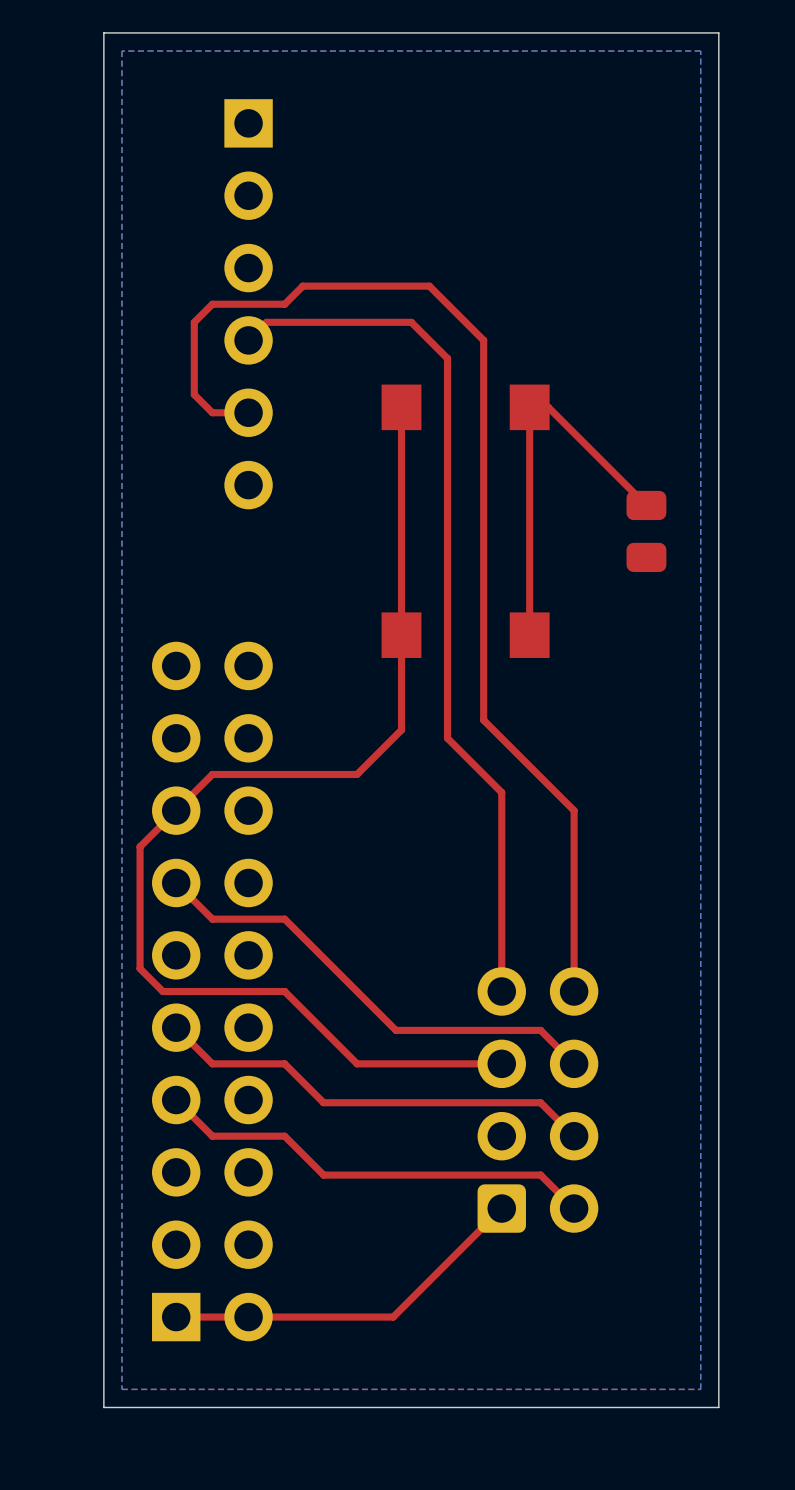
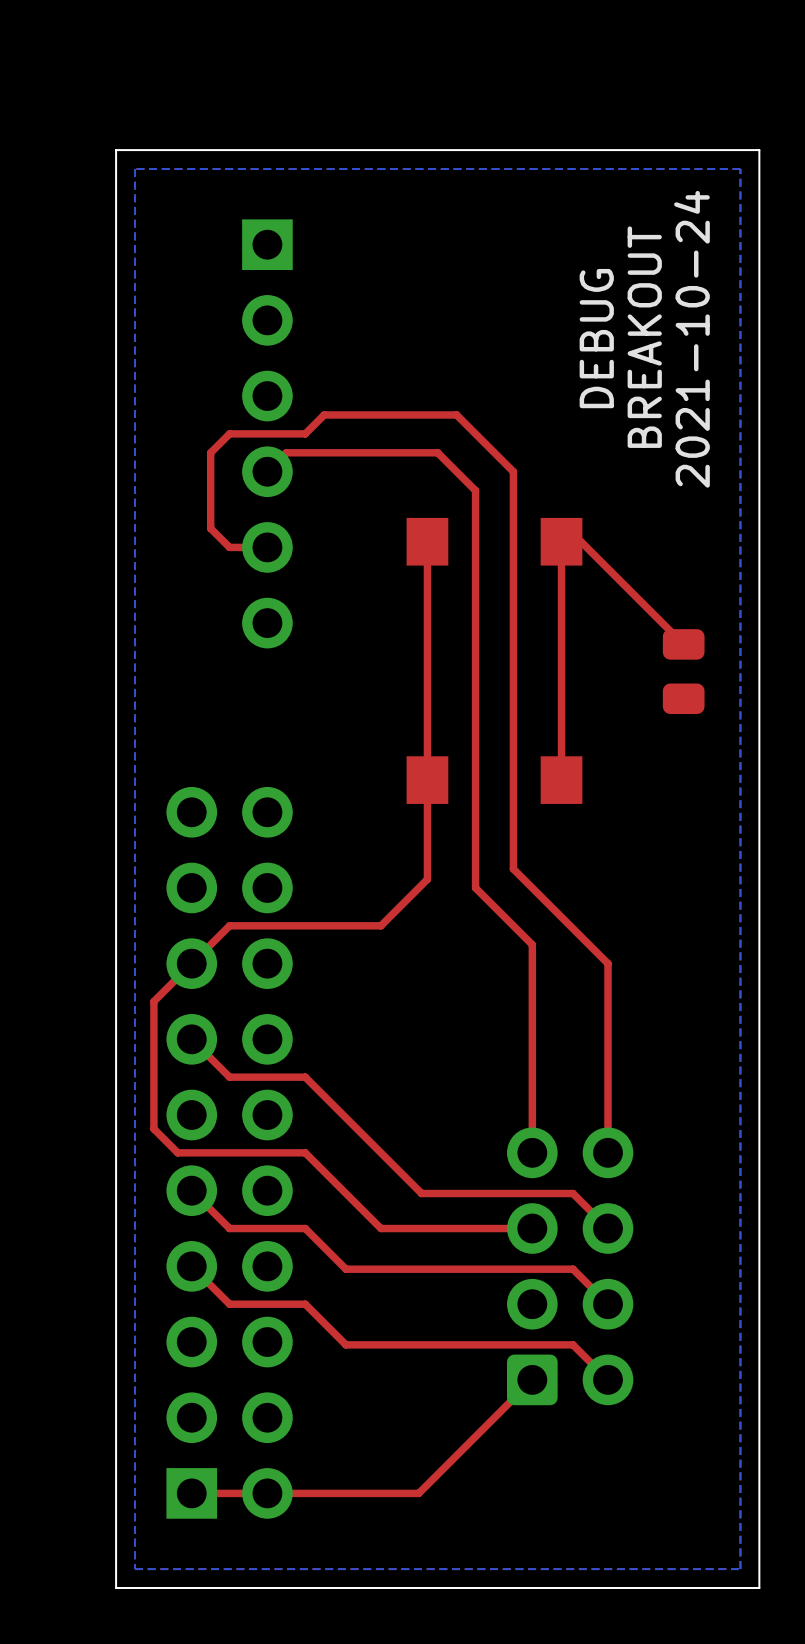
text: none -> BREAKOUT (644, 337)
text: none -> DEBUG (596, 338)
text: none -> 2021-10-24 (691, 339)

